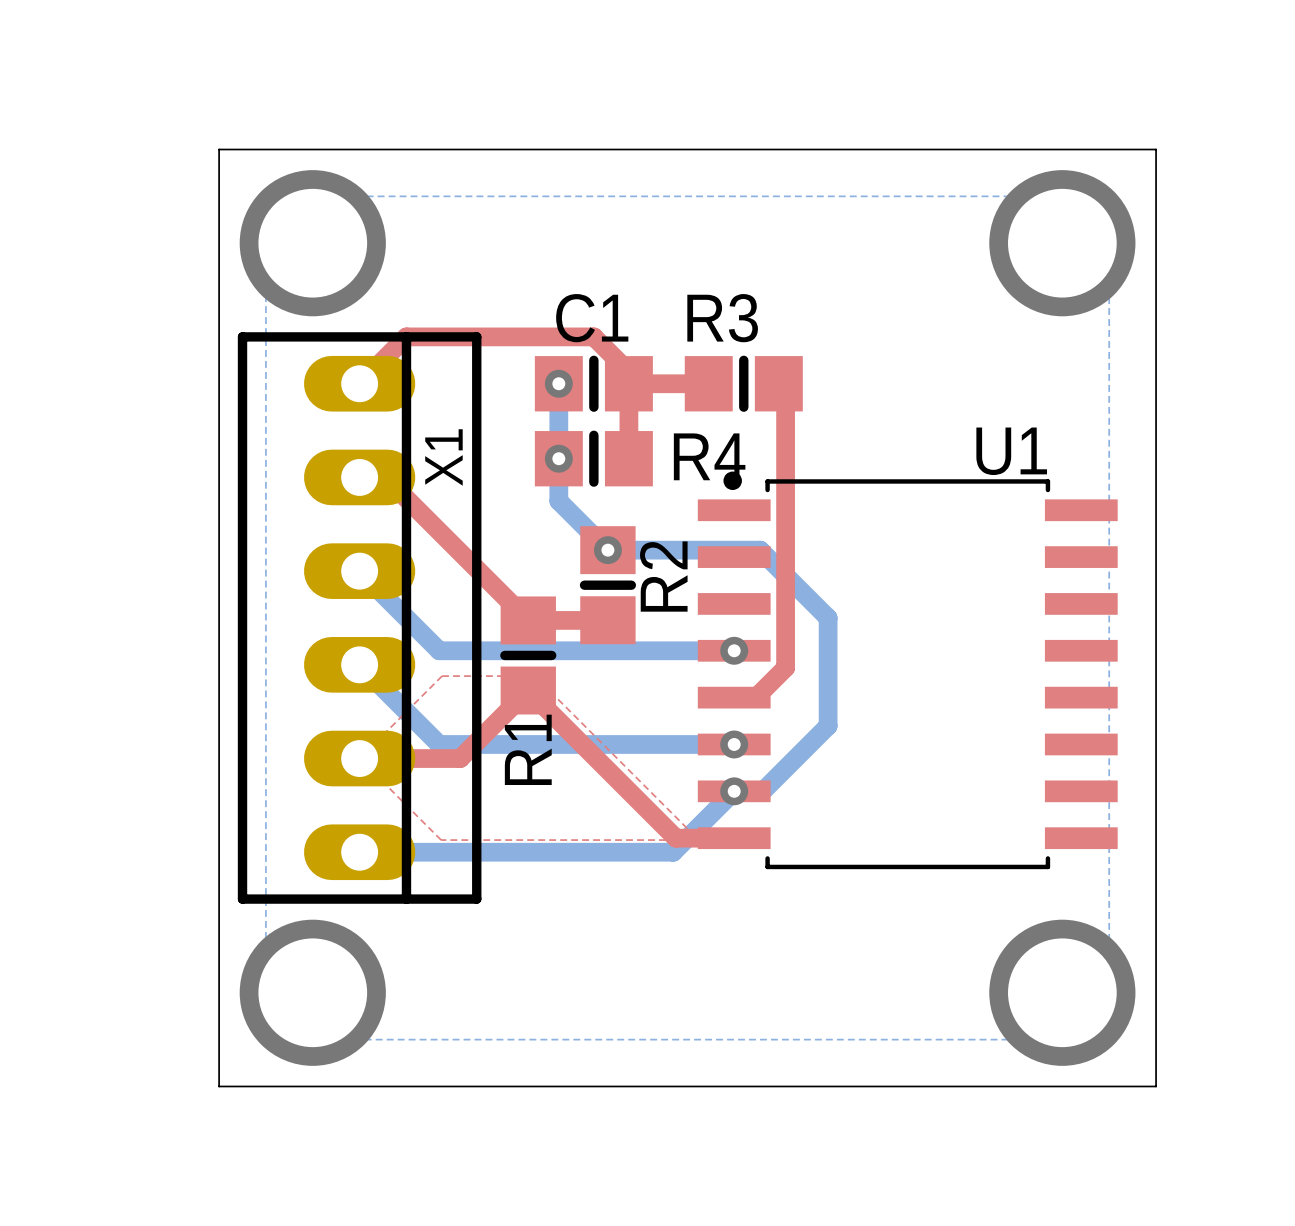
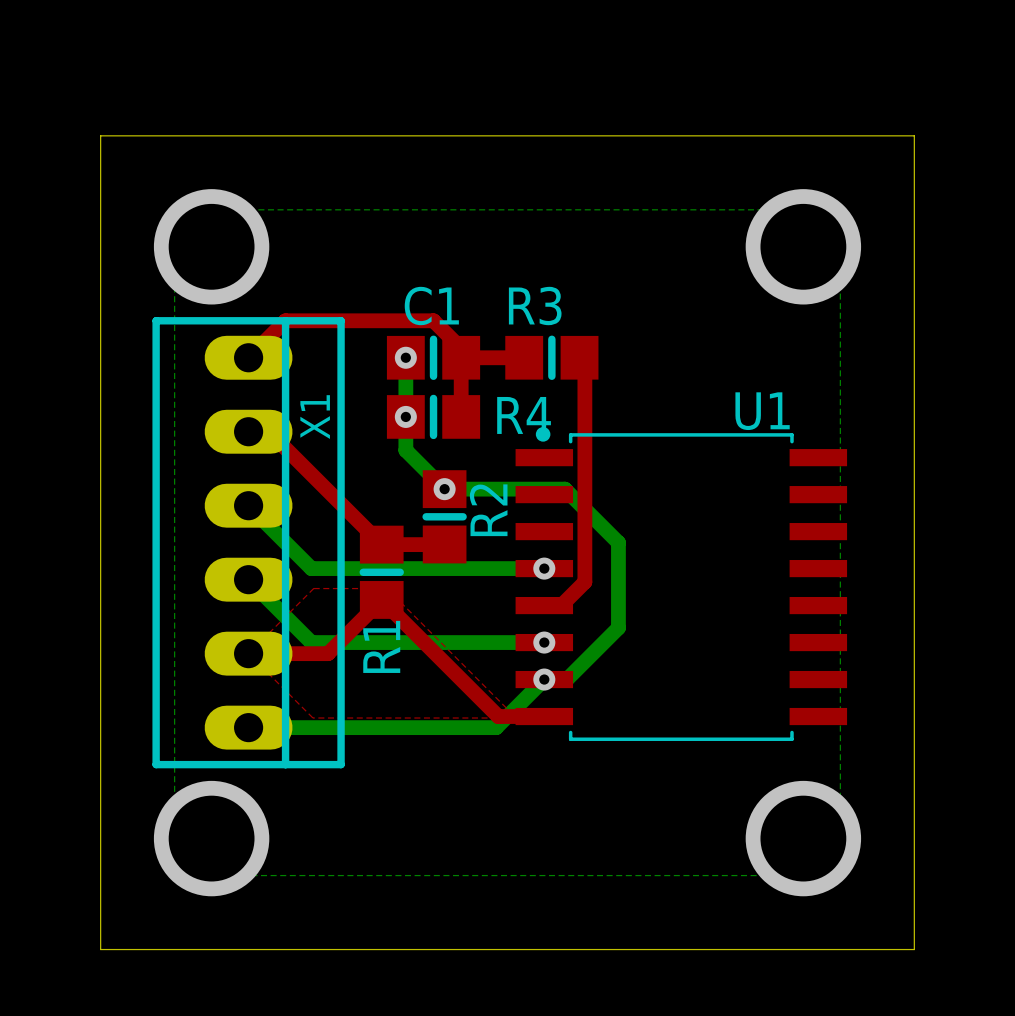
board edge: (219, 149) (1156, 149) (1156, 1086) (219, 1086) (219, 149) -> (100, 135) (100, 949) (914, 949) (914, 135) (100, 135)

